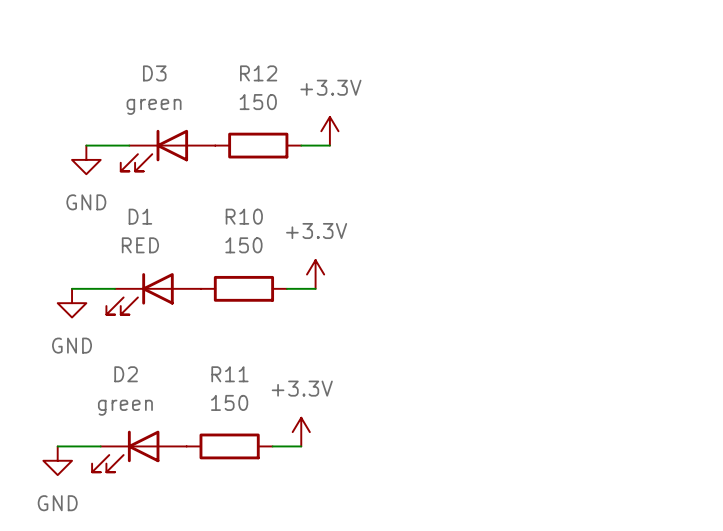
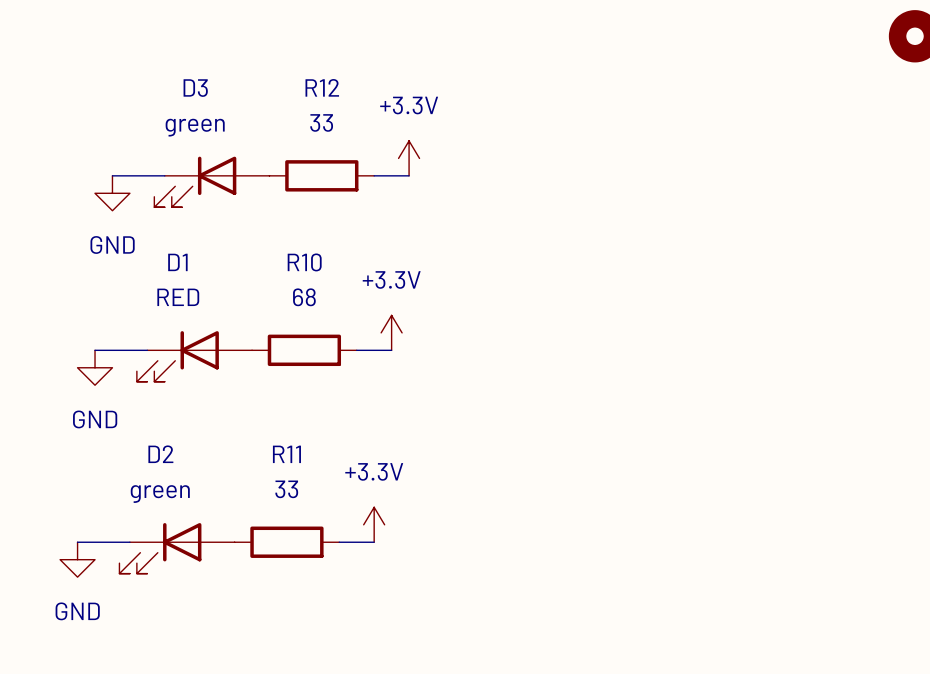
R12 value: 150 (258, 102) -> 33 (321, 122)
R10 value: 150 (243, 245) -> 68 (304, 297)
R11 value: 150 (229, 402) -> 33 (286, 489)

